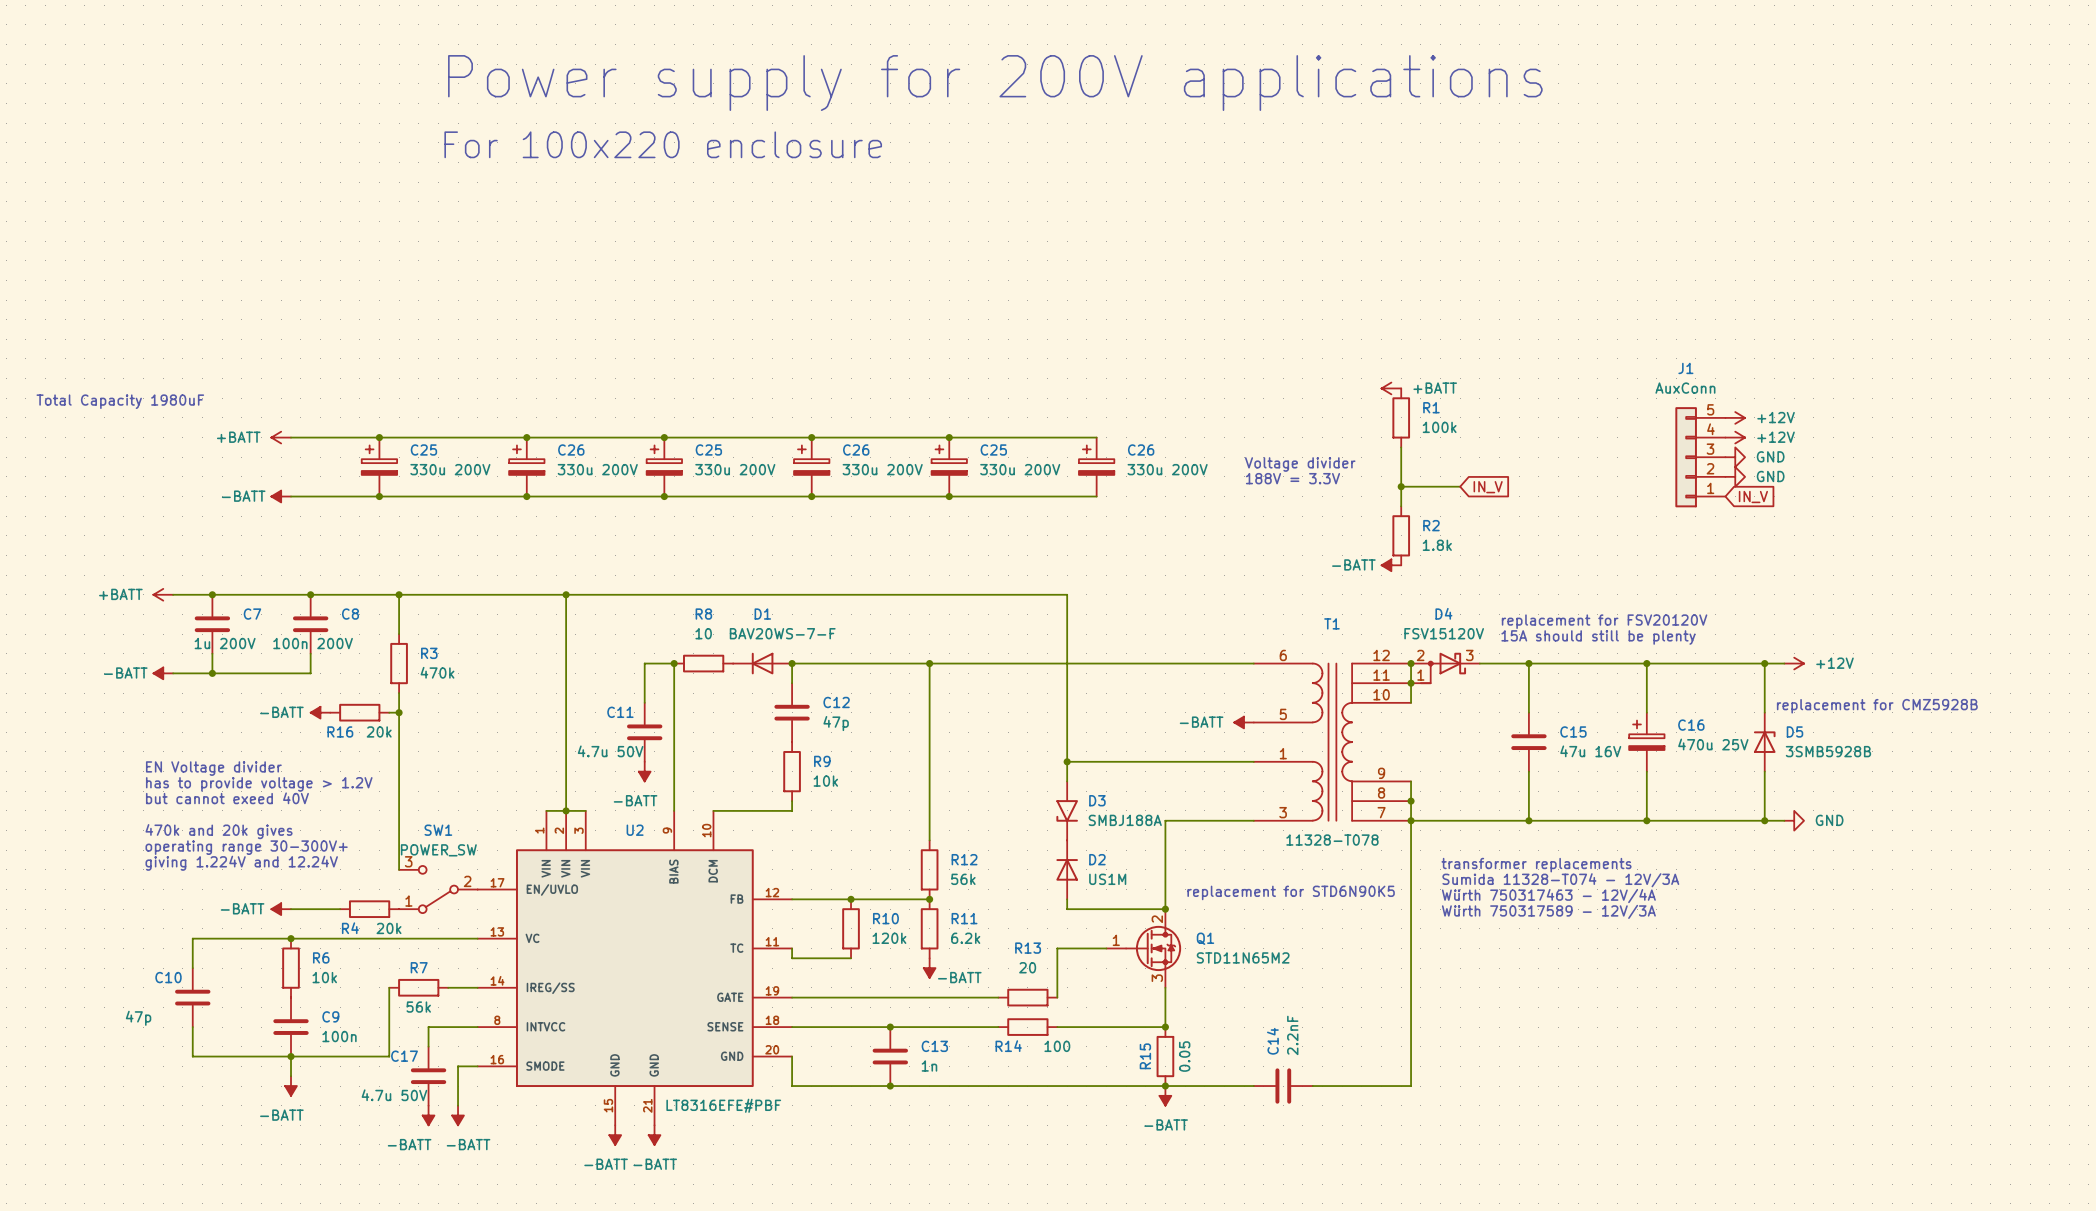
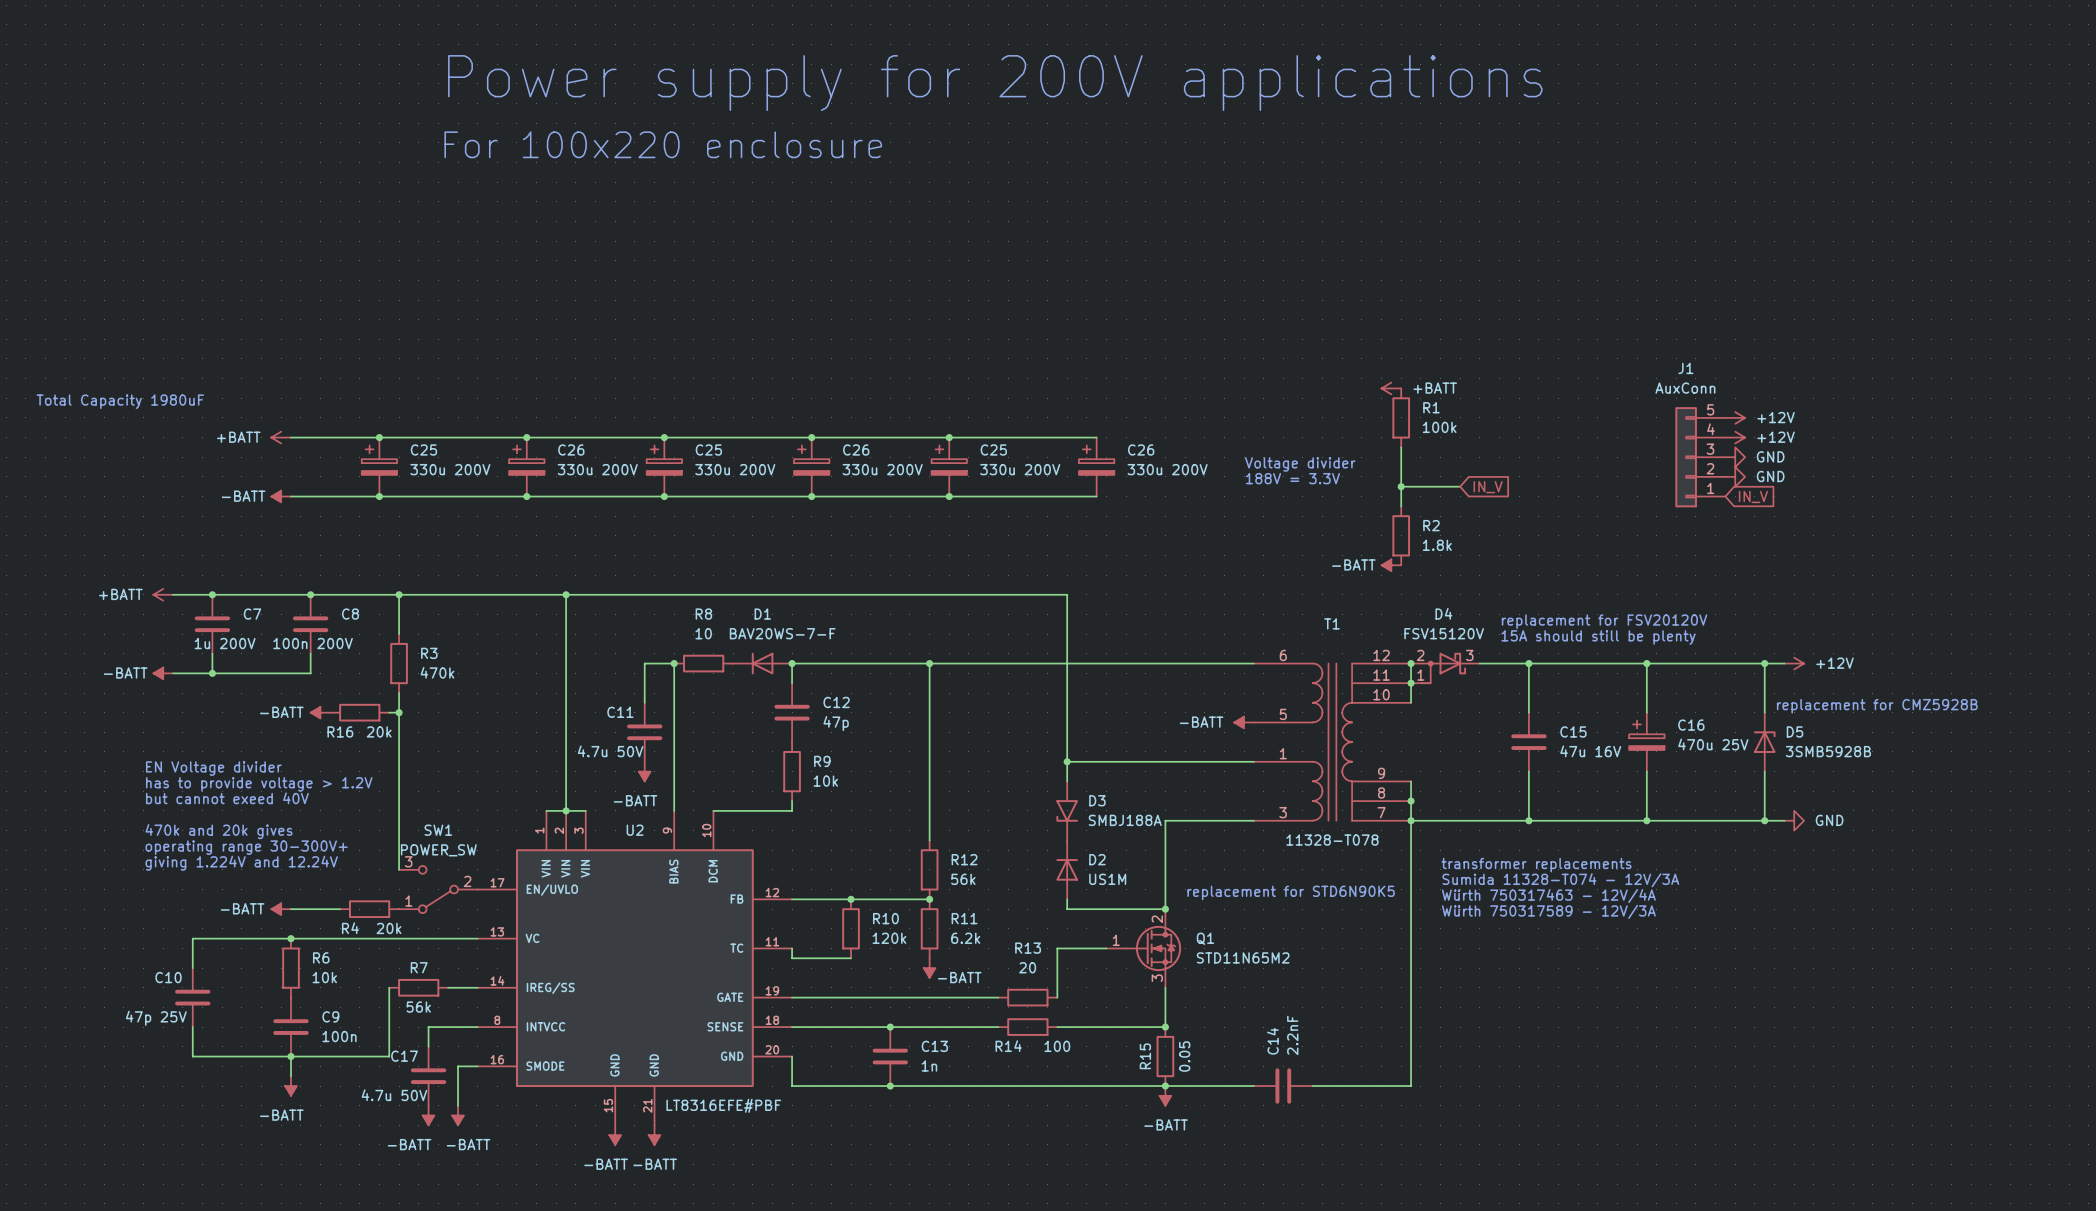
C10 value: 47p (138, 1018) -> 47p 25V (156, 1018)

